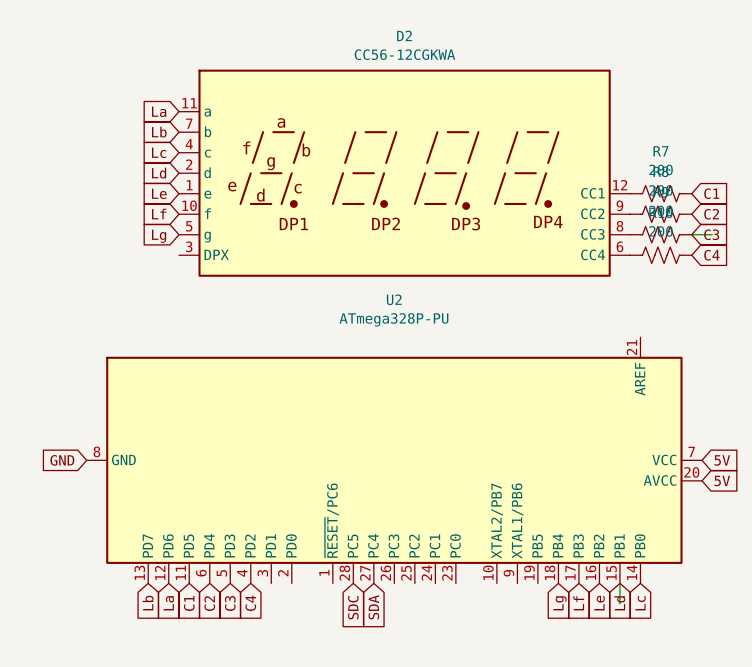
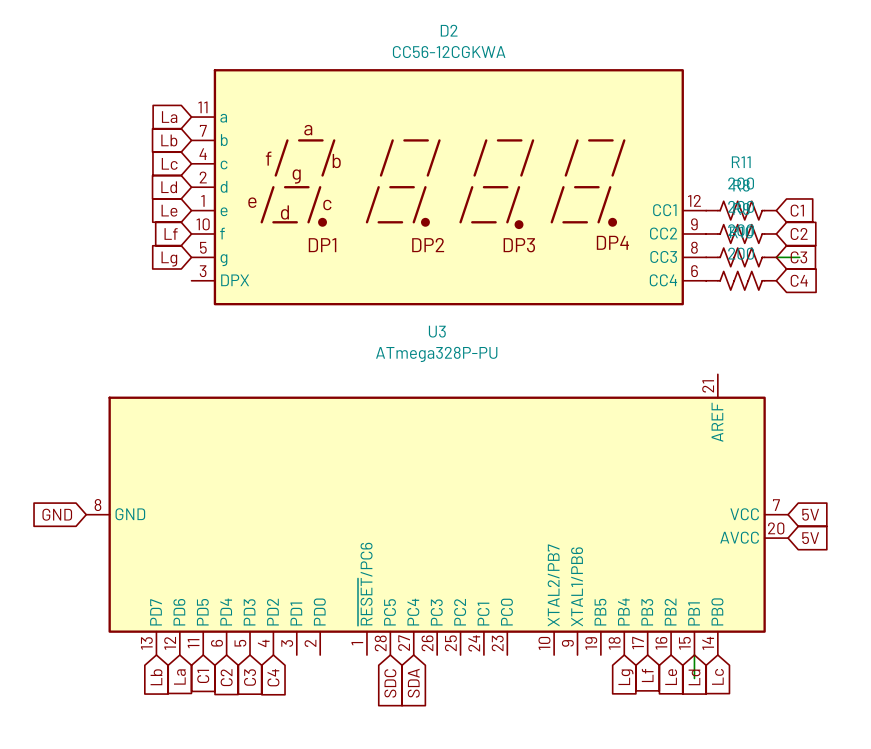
R7 name: R7 (660, 151) -> R11 (741, 162)
U2 name: U2 (394, 299) -> U3 (437, 331)

